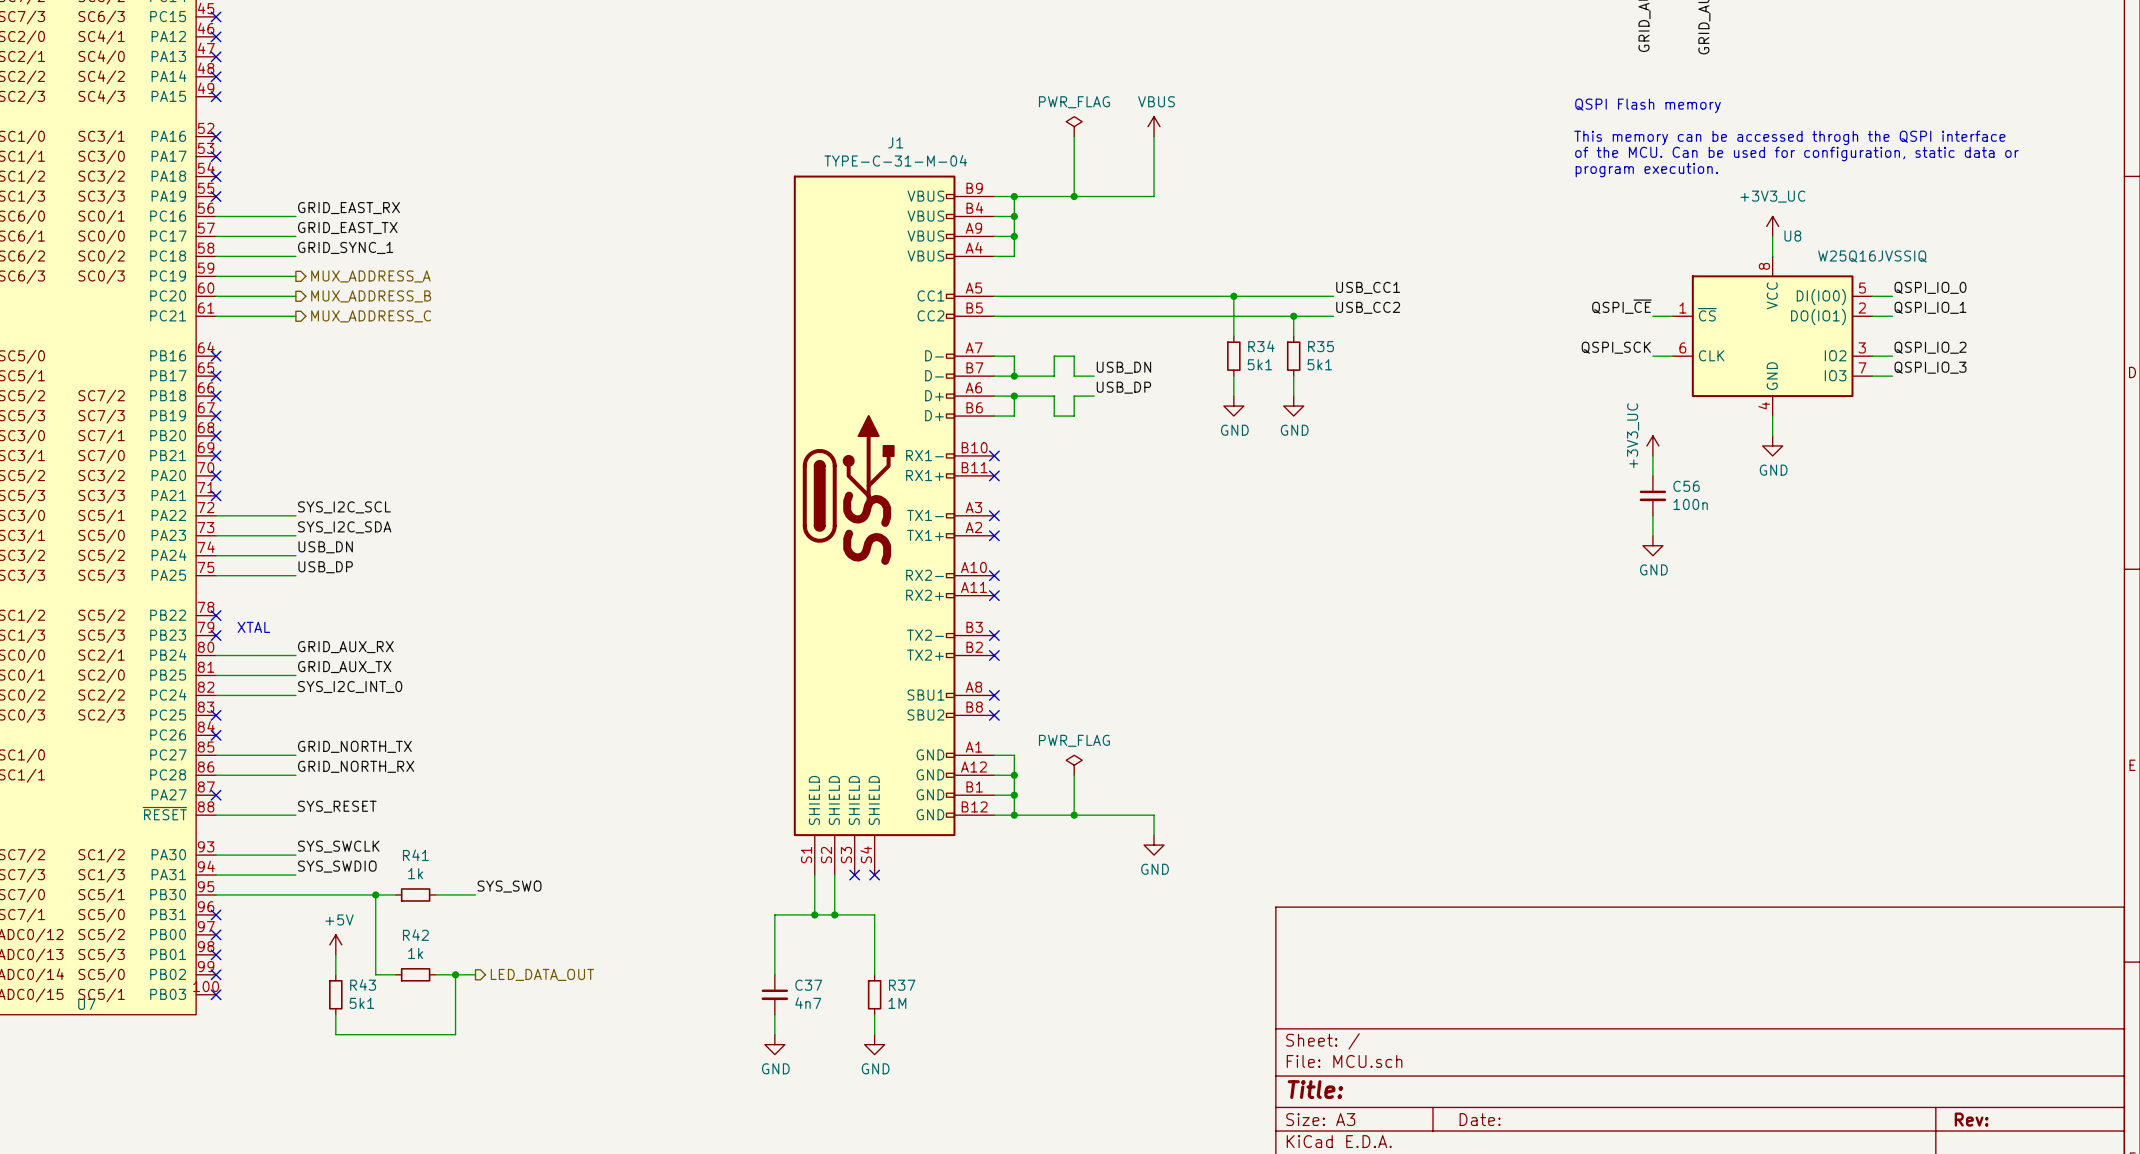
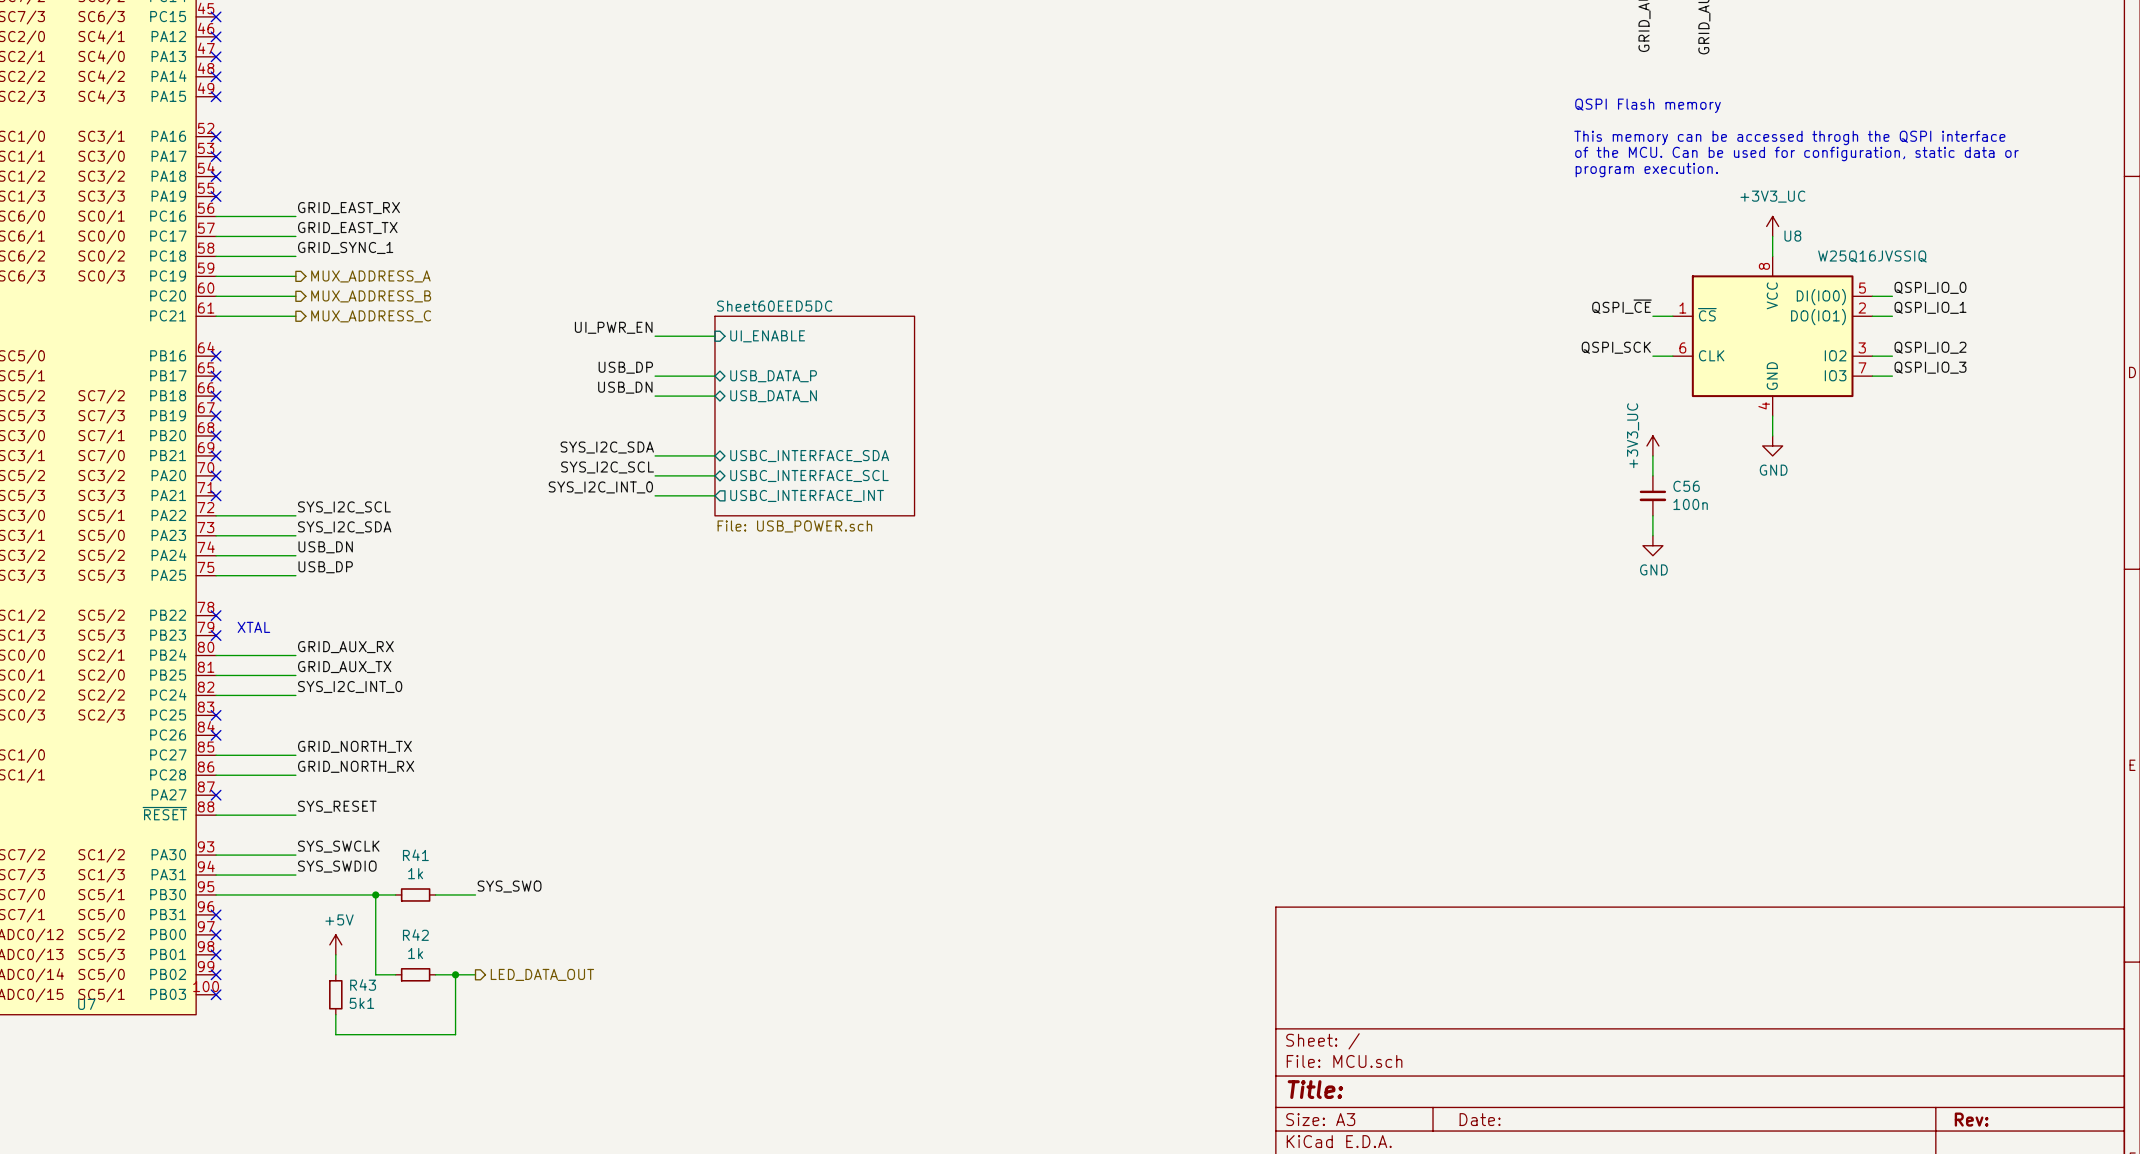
power symbol: PWR_FLAG (1074, 126) -> none
power symbol: VBUS (1154, 126) -> none
wire: (1074, 136) (1074, 196) -> none
wire: (1154, 136) (1154, 196) (994, 196) -> none
wire: (1014, 196) (1014, 256) (994, 256) -> none
junction: (1014, 196) -> none
junction: (1074, 196) -> none
wire: (994, 216) (1014, 216) -> none
junction: (1014, 216) -> none
wire: (994, 236) (1014, 236) -> none
junction: (1014, 236) -> none
label: USB_CC1 (1368, 287) -> none
wire: (994, 296) (1333, 296) -> none
wire: (1233, 296) (1233, 336) -> none
junction: (1233, 296) -> none
label: USB_CC2 (1368, 307) -> none
wire: (994, 316) (1333, 316) -> none
wire: (1293, 316) (1293, 336) -> none
junction: (1293, 316) -> none
label: none -> UI_PWR_EN (613, 327)
wire: none -> (655, 336) (714, 336)
sheet pin: none -> UI_ENABLE (767, 336)
wire: (994, 356) (1014, 356) (1014, 376) -> none
R34: 5k1 (1233, 356) -> none
R35: 5k1 (1293, 356) -> none
label: none -> USB_DP (625, 367)
label: USB_DN (1123, 367) -> none
wire: none -> (655, 376) (714, 376)
sheet pin: none -> USB_DATA_P (773, 376)
wire: (994, 376) (1054, 376) (1054, 356) (1074, 356) (1074, 376) (1094, 376) -> none
junction: (1014, 376) -> none
wire: (1233, 376) (1233, 396) -> none
wire: (1293, 376) (1293, 396) -> none
label: none -> USB_DN (625, 387)
label: USB_DP (1123, 387) -> none
wire: none -> (655, 396) (714, 396)
sheet pin: none -> USB_DATA_N (773, 396)
wire: (994, 396) (1054, 396) (1054, 416) (1074, 416) (1074, 396) (1094, 396) -> none
wire: (1014, 396) (1014, 416) (994, 416) -> none
junction: (1014, 396) -> none
power symbol: GND (1233, 406) -> none
power symbol: GND (1293, 406) -> none
sheet Sheet60EED5DC: none -> File: USB_POWER.sch (814, 416)
label: none -> SYS_I2C_SDA (607, 447)
wire: none -> (655, 455) (714, 455)
no-connect mark: (994, 455) -> none
sheet pin: none -> USBC_INTERFACE_SDA (809, 456)
label: none -> SYS_I2C_SCL (607, 467)
wire: none -> (655, 475) (714, 475)
no-connect mark: (994, 475) -> none
sheet pin: none -> USBC_INTERFACE_SCL (809, 476)
label: none -> SYS_I2C_INT_0 (600, 487)
wire: none -> (655, 495) (714, 495)
sheet pin: none -> USBC_INTERFACE_INT (807, 495)
no-connect mark: (994, 515) -> none
J1: TYPE-C-31-M-04 (894, 525) -> none
no-connect mark: (994, 535) -> none
no-connect mark: (994, 575) -> none
no-connect mark: (994, 595) -> none
no-connect mark: (994, 635) -> none
no-connect mark: (994, 655) -> none
no-connect mark: (994, 695) -> none
no-connect mark: (994, 715) -> none
wire: (994, 755) (1014, 755) (1014, 815) -> none
power symbol: PWR_FLAG (1074, 765) -> none
wire: (994, 775) (1014, 775) -> none
junction: (1014, 775) -> none
wire: (1074, 775) (1074, 815) -> none
wire: (994, 795) (1014, 795) -> none
junction: (1014, 795) -> none
wire: (994, 815) (1154, 815) (1154, 835) -> none
junction: (1014, 815) -> none
junction: (1074, 815) -> none
power symbol: GND (1154, 845) -> none
wire: (814, 875) (814, 914) -> none
wire: (834, 875) (834, 914) -> none
no-connect mark: (854, 875) -> none
no-connect mark: (874, 875) -> none
junction: (814, 914) -> none
junction: (834, 914) -> none
wire: (774, 974) (774, 914) (874, 914) (874, 974) -> none
C37: 4n7 (774, 994) -> none
R37: 1M (874, 994) -> none
wire: (774, 1014) (774, 1034) -> none
wire: (874, 1014) (874, 1034) -> none
power symbol: GND (774, 1044) -> none
power symbol: GND (874, 1044) -> none

